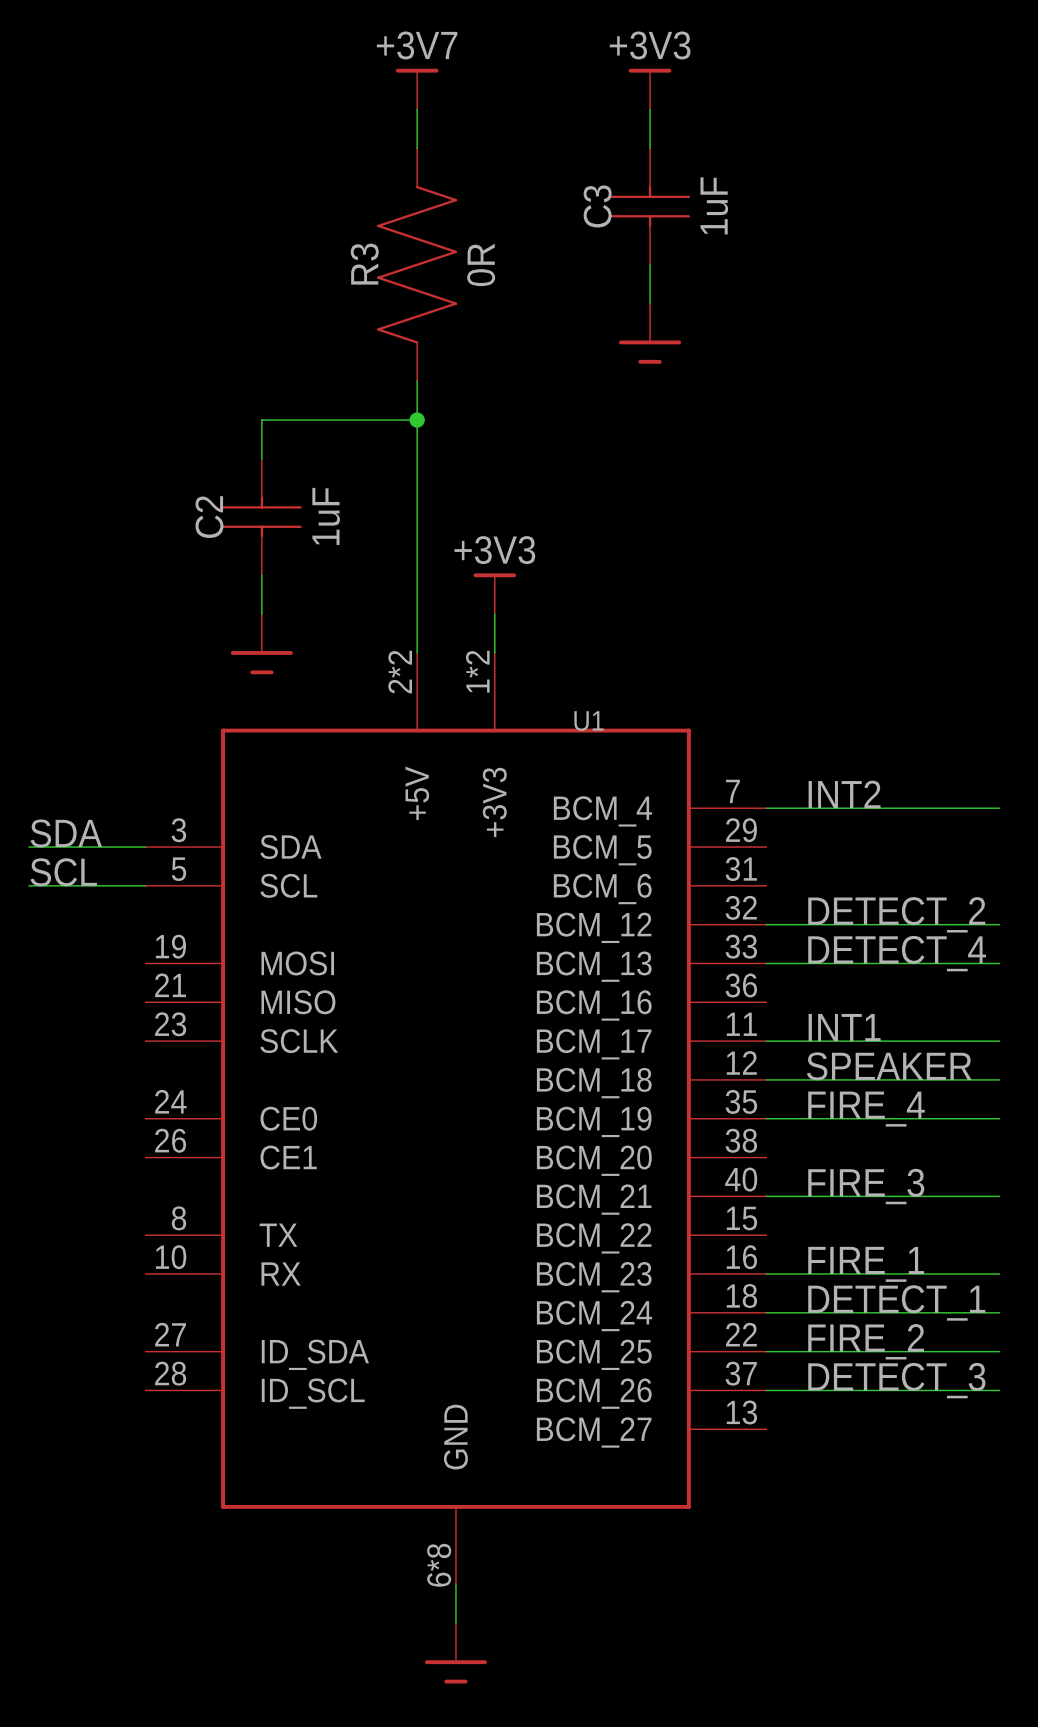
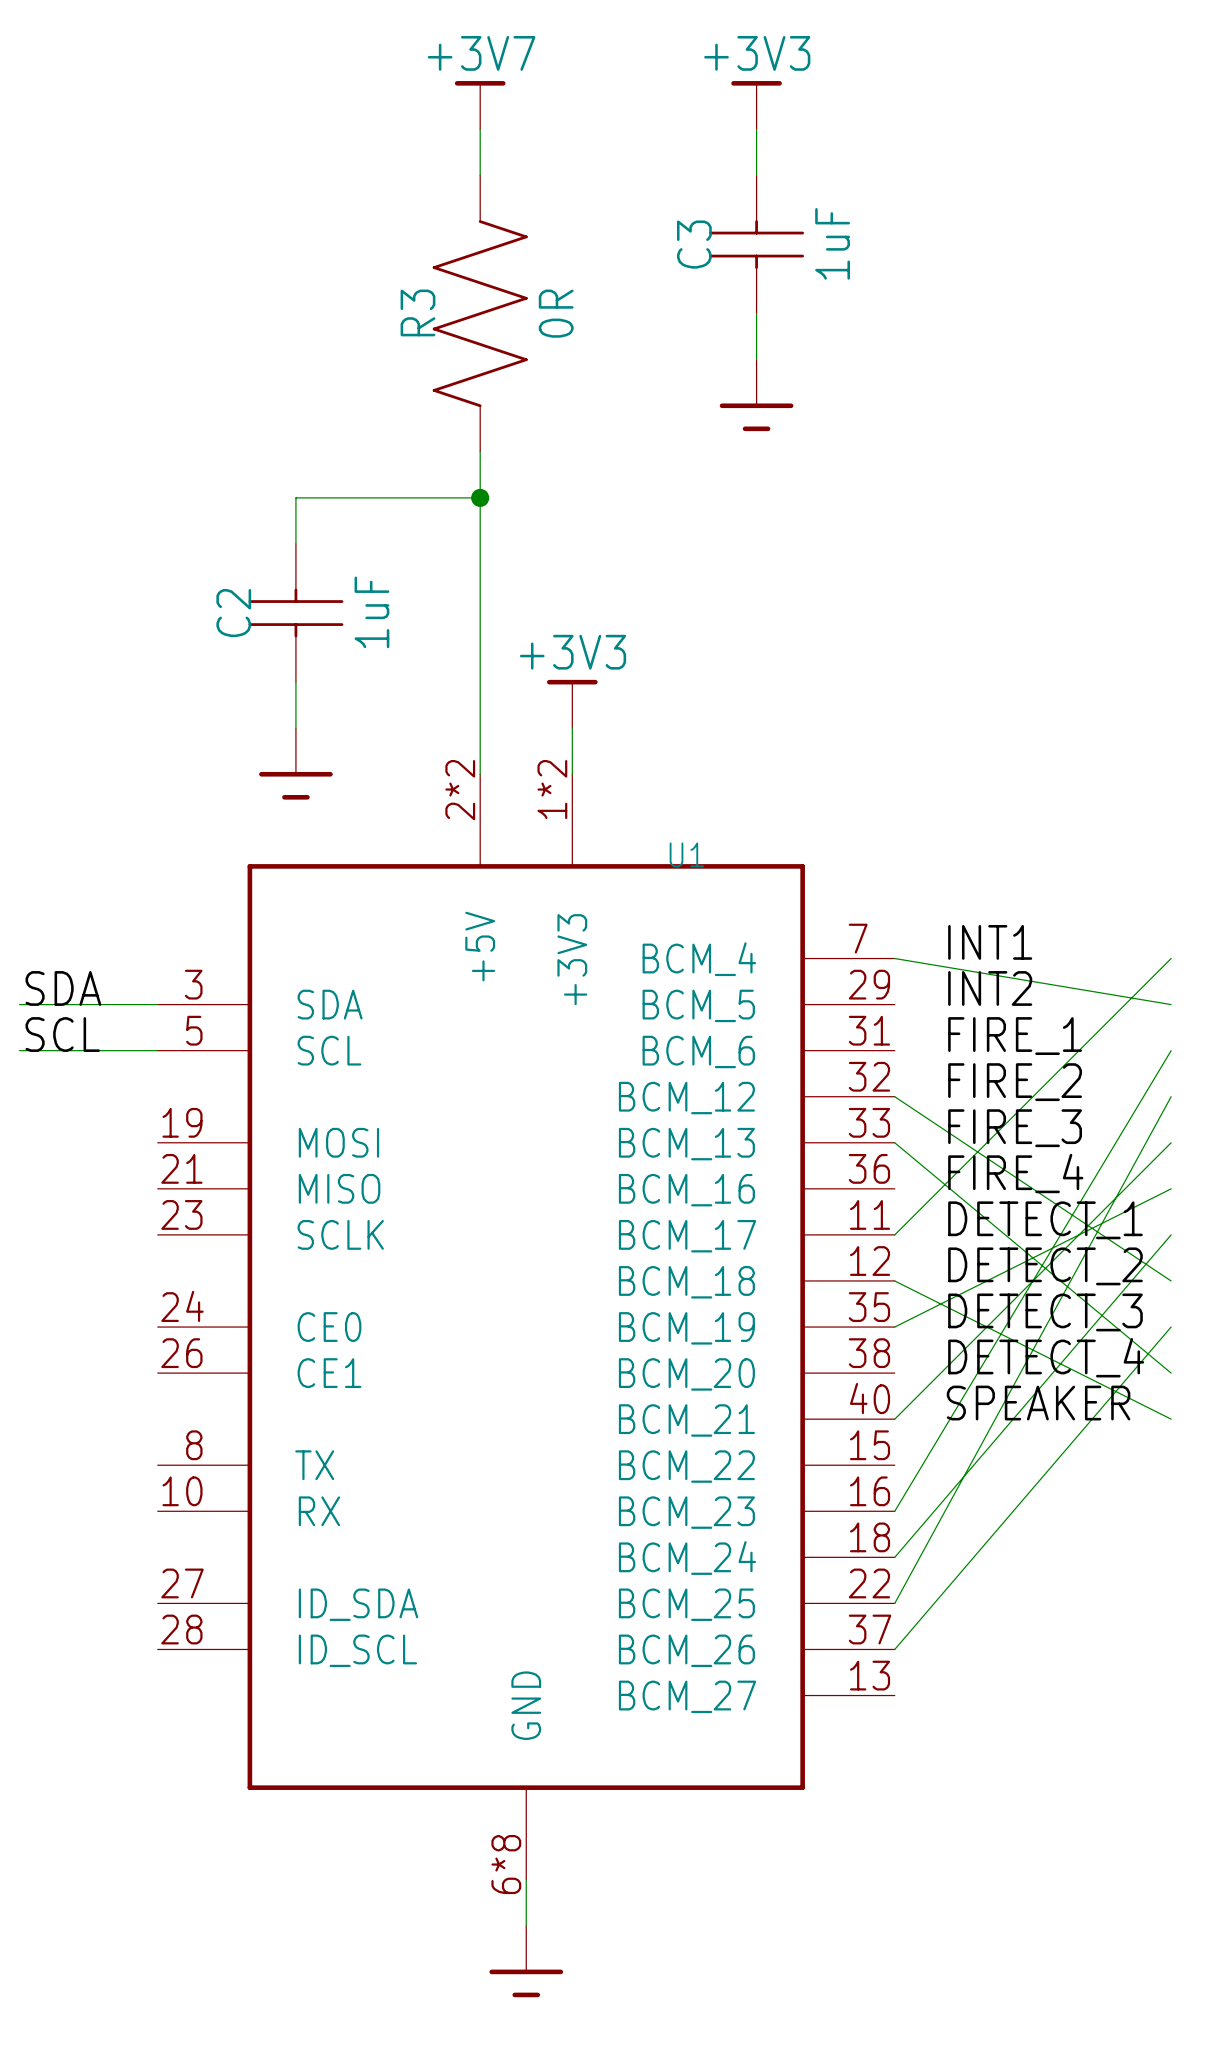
label: INT2 (844, 794) -> INT1 (990, 942)
wire: (766, 808) (999, 808) -> (894, 958) (1171, 1004)
label: none -> INT2 (990, 988)
label: none -> FIRE_1 (1015, 1036)
label: DETECT_2 (896, 914) -> FIRE_2 (1015, 1082)
wire: (766, 924) (999, 924) -> (894, 1096) (1171, 1280)
label: DETECT_4 (897, 953) -> FIRE_3 (1015, 1128)
wire: (766, 963) (999, 963) -> (894, 1142) (1171, 1373)
label: none -> FIRE_4 (1015, 1173)
label: INT1 (844, 1027) -> DETECT_1 (1045, 1220)
wire: (766, 1041) (999, 1041) -> (894, 1234) (1171, 958)
label: SPEAKER (889, 1066) -> DETECT_2 (1045, 1266)
wire: (766, 1079) (999, 1079) -> (894, 1280) (1171, 1419)
label: FIRE_4 (866, 1109) -> DETECT_3 (1045, 1312)
wire: (766, 1118) (999, 1118) -> (894, 1327) (1171, 1188)
label: none -> DETECT_4 (1046, 1357)
label: FIRE_3 (866, 1186) -> SPEAKER (1038, 1403)
wire: (766, 1196) (999, 1196) -> (894, 1419) (1171, 1142)
label: FIRE_1 (866, 1264) -> none
wire: (766, 1274) (999, 1274) -> (894, 1511) (1171, 1050)
label: DETECT_1 (896, 1302) -> none
wire: (766, 1312) (999, 1312) -> (894, 1557) (1171, 1234)
label: FIRE_2 (866, 1341) -> none
wire: (766, 1351) (999, 1351) -> (894, 1603) (1171, 1096)
label: DETECT_3 (896, 1380) -> none
wire: (766, 1390) (999, 1390) -> (894, 1649) (1171, 1327)

